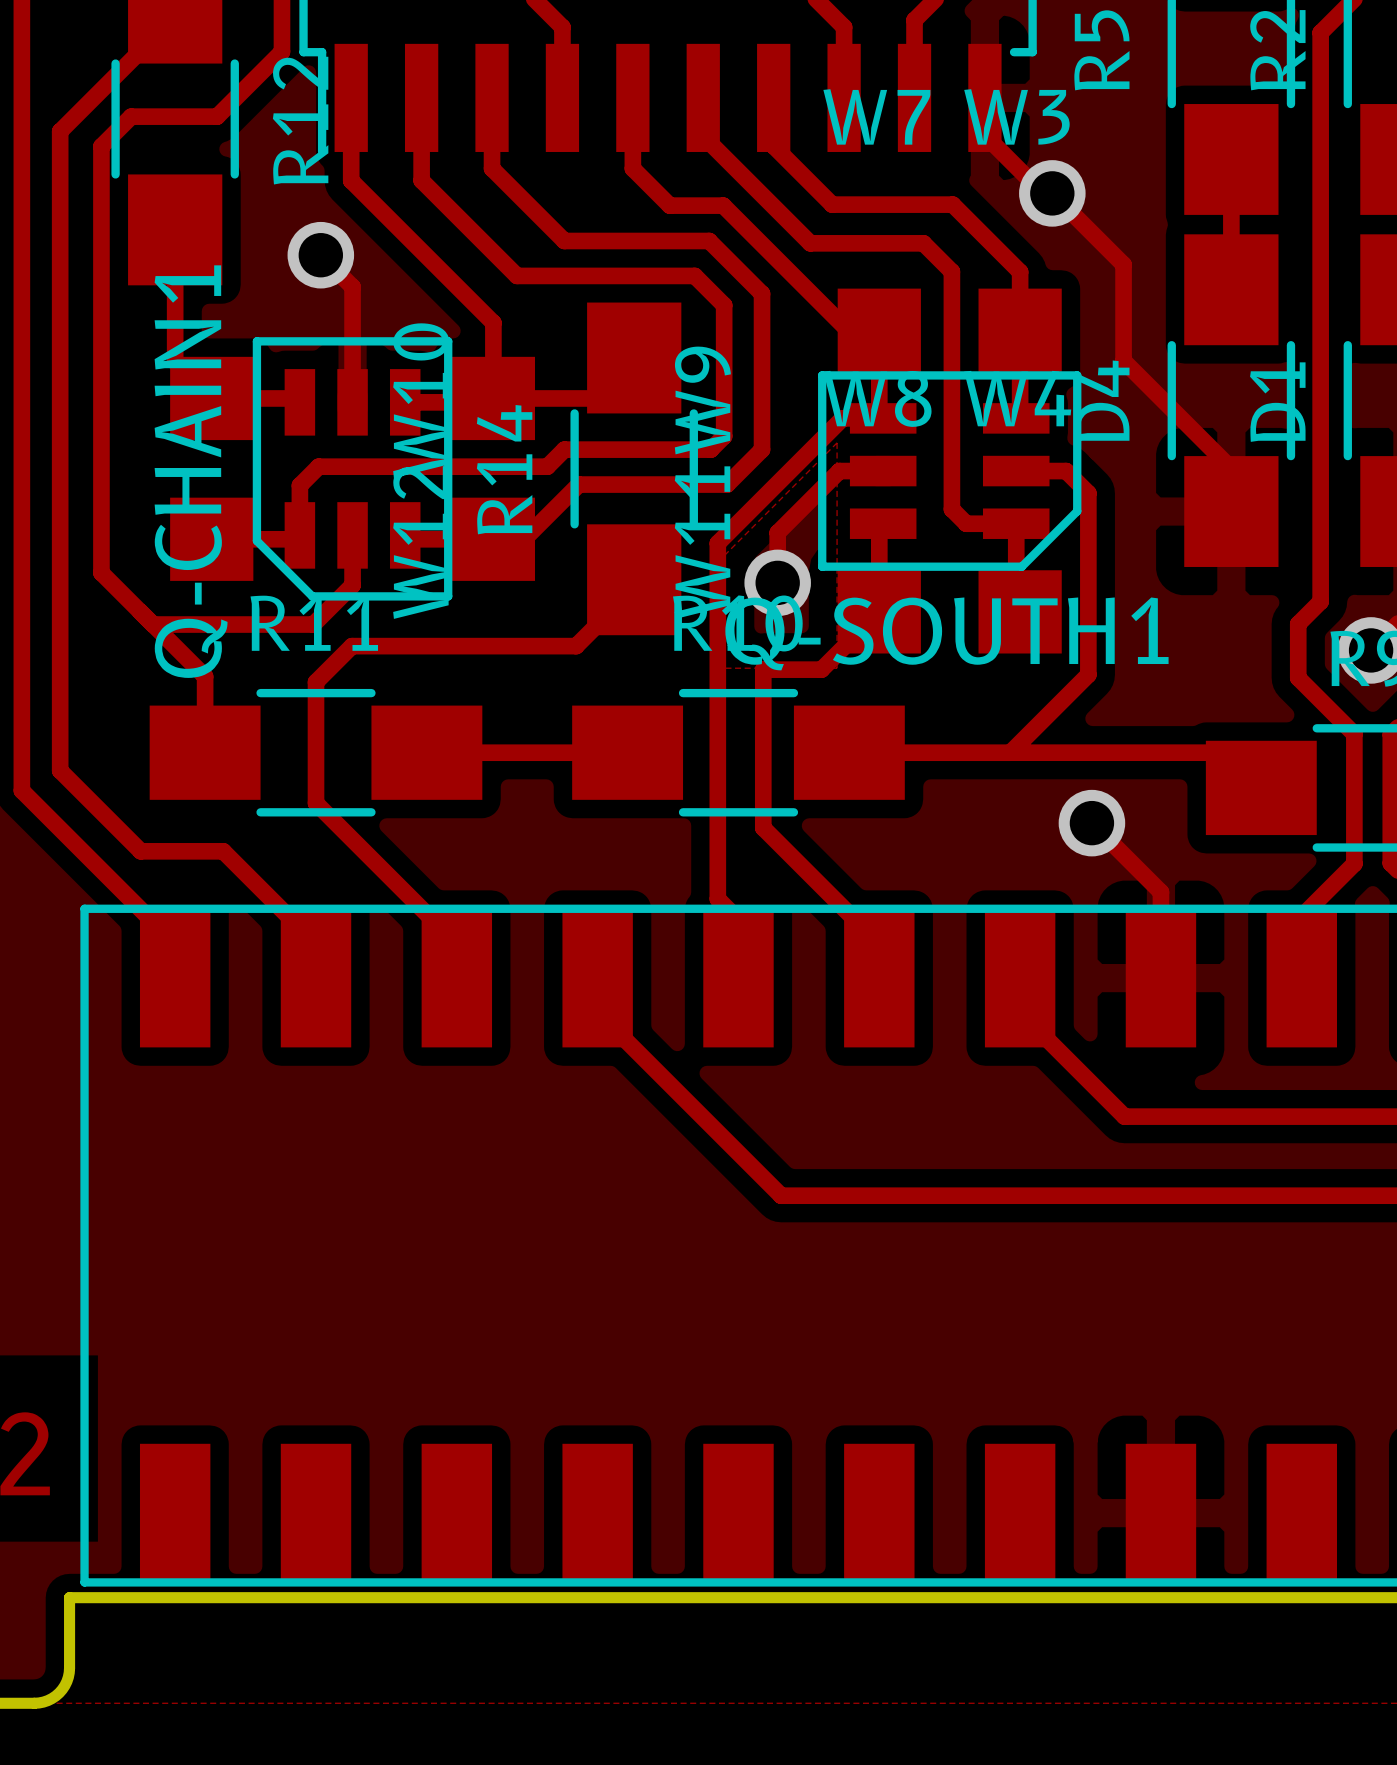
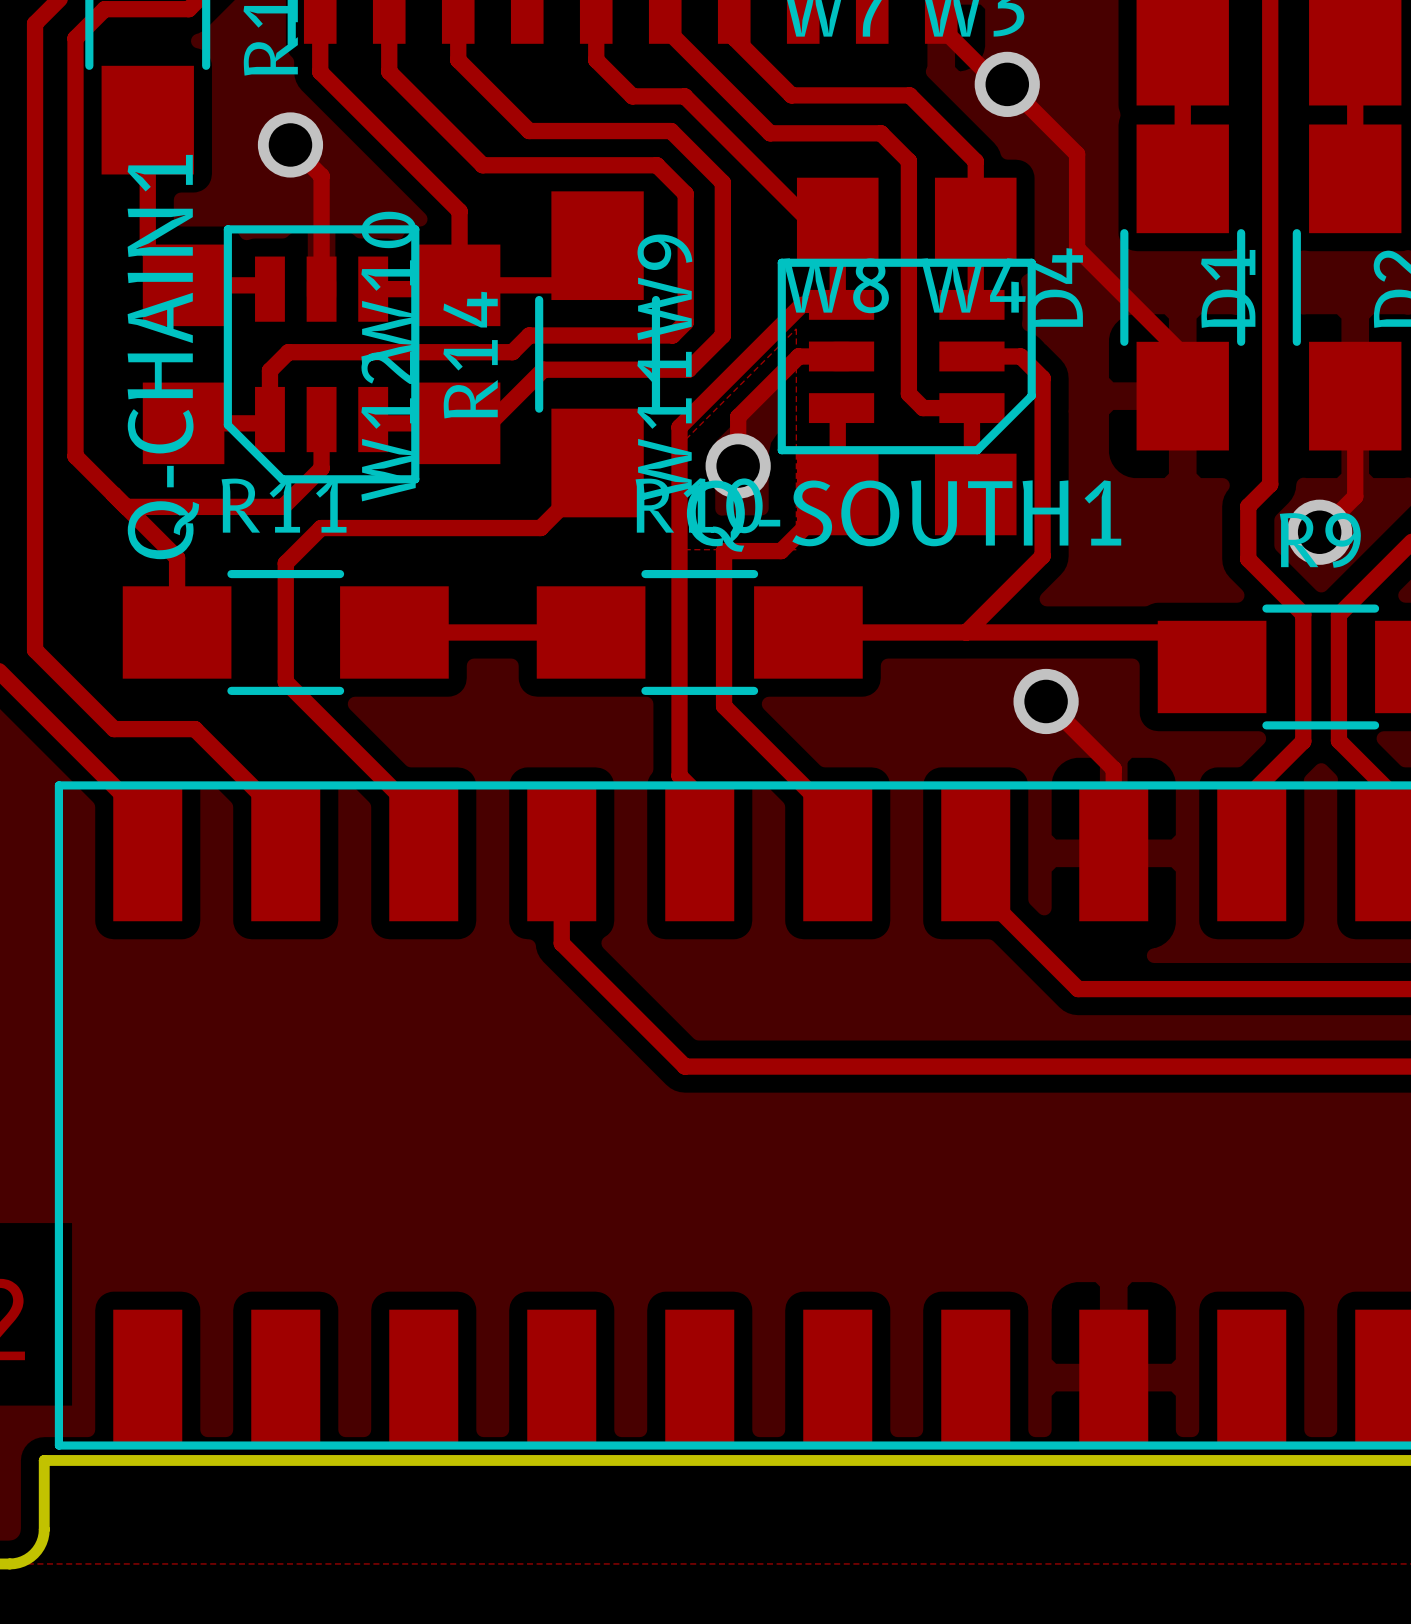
track: (597, 1012) (781, 1195) -> (561, 886) (561, 943) (684, 1066) (741, 1066)

